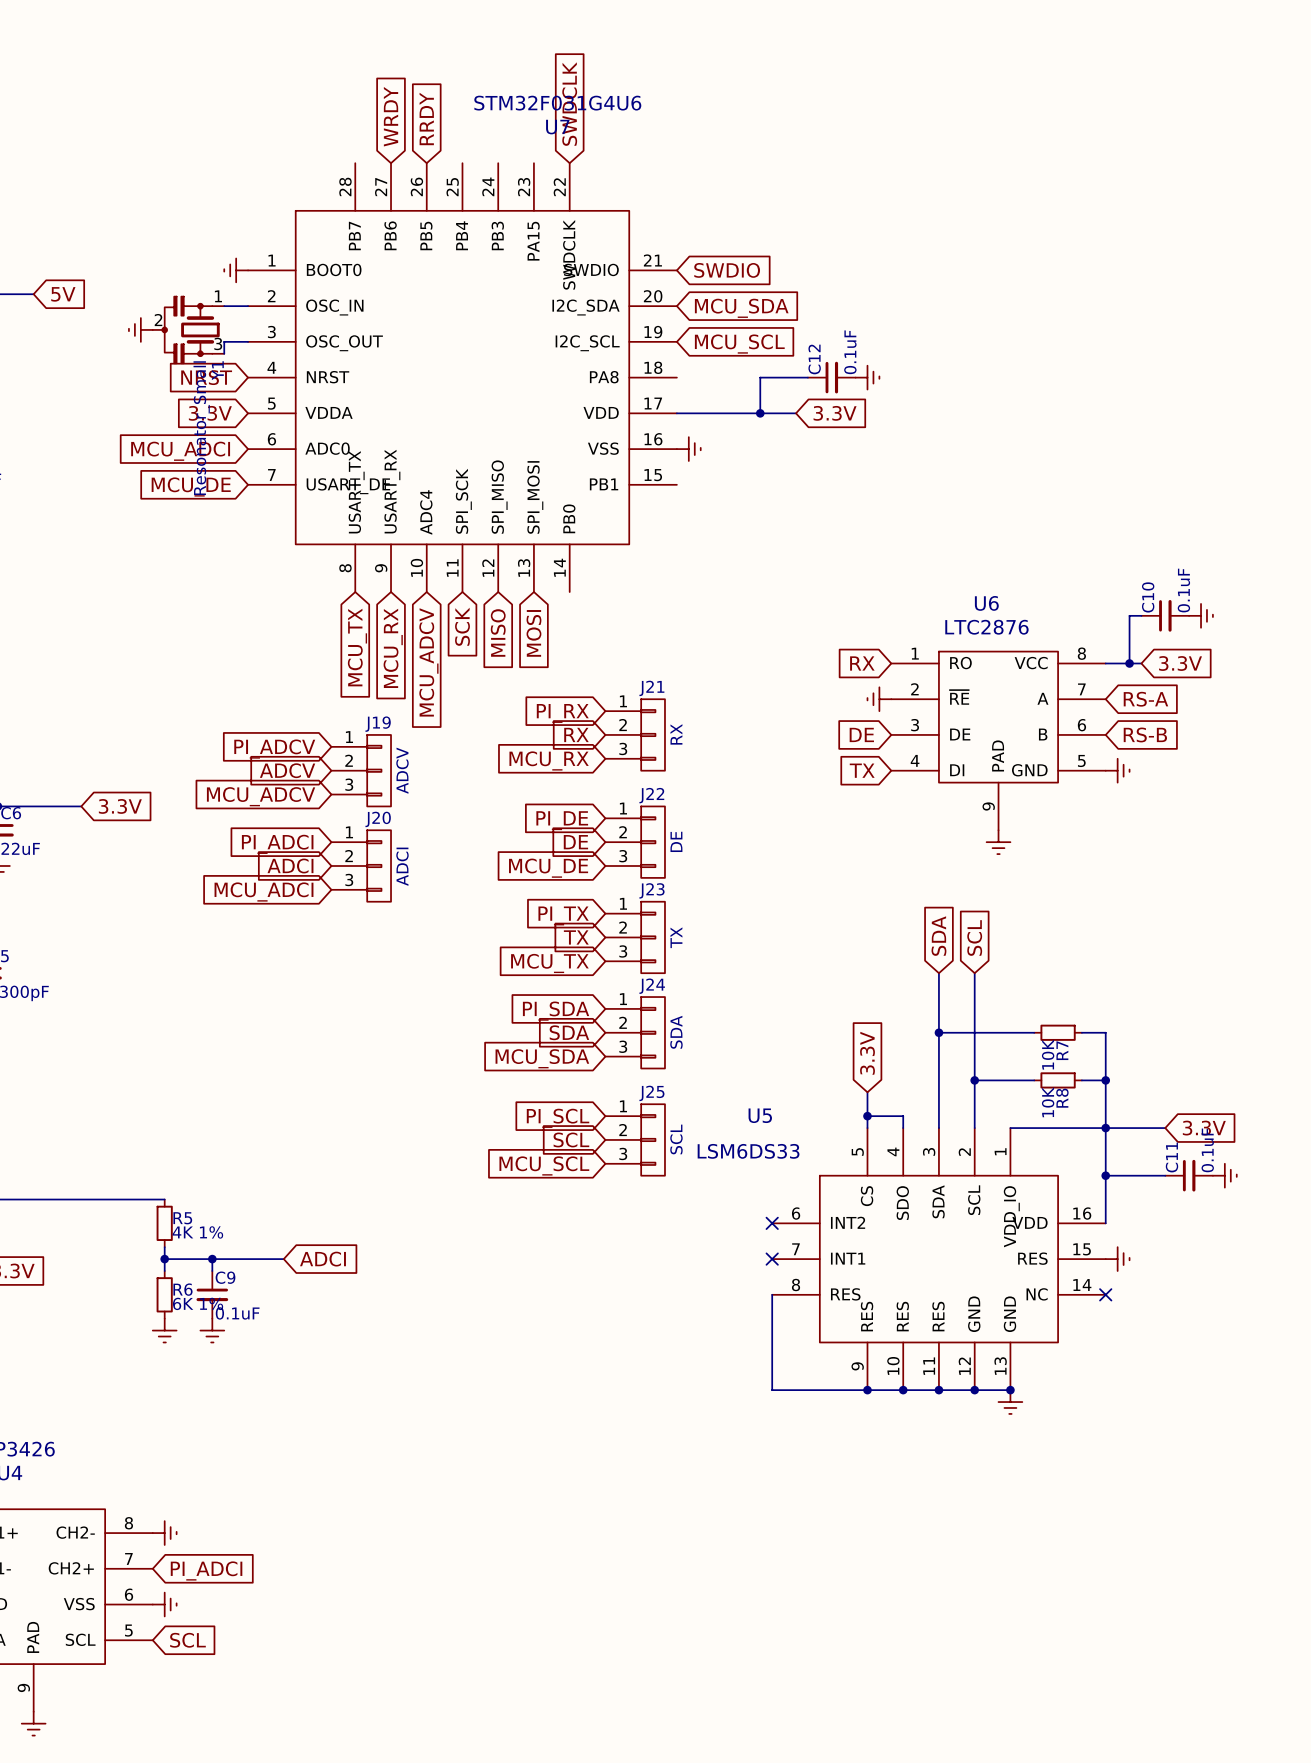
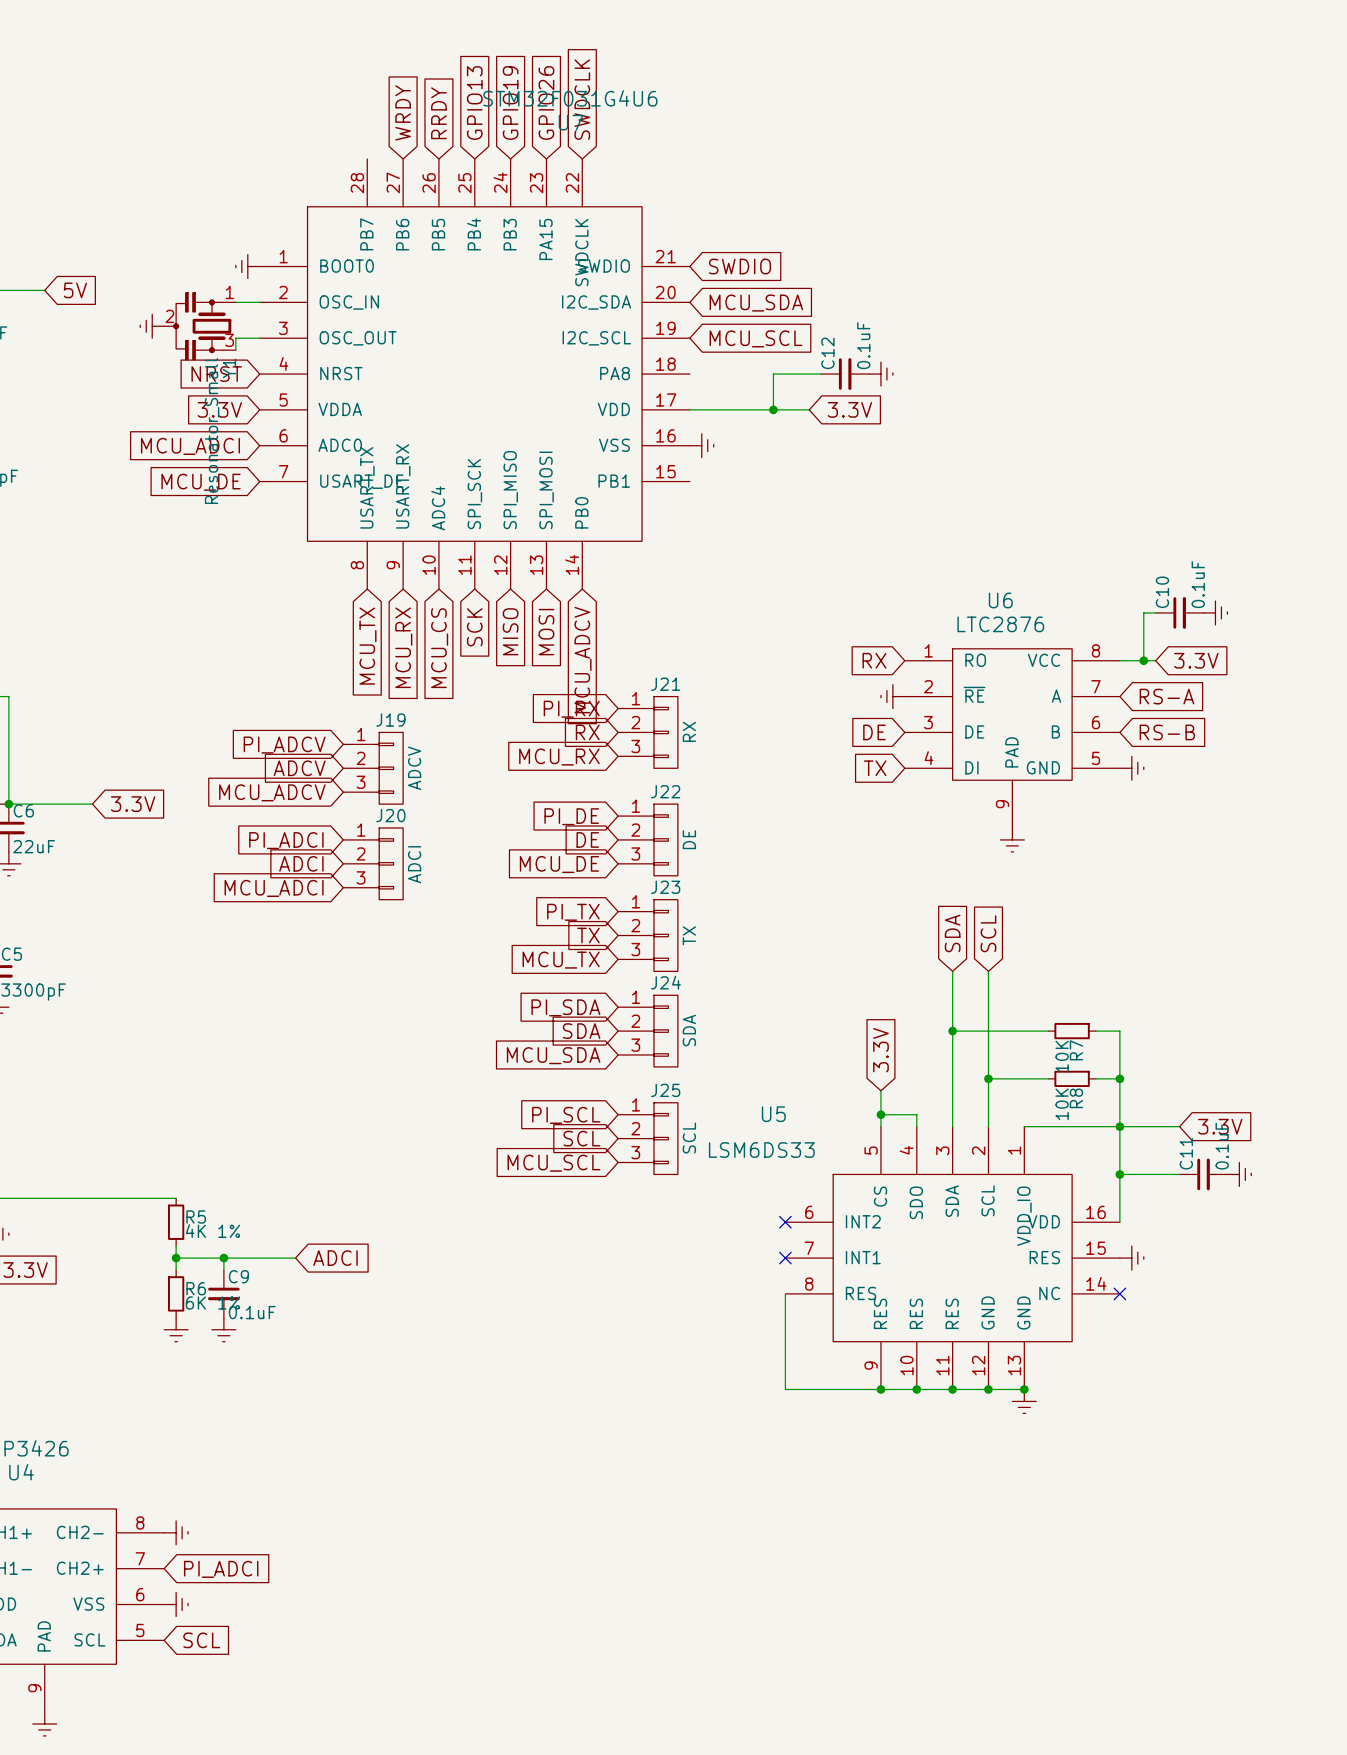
global label: none -> GPIO13 (474, 103)
global label: none -> GPIO19 (510, 103)
global label: none -> GPIO26 (546, 103)
global label: MCU_ADCV (428, 662) -> MCU_CS (439, 648)
global label: none -> MCU_ADCV (582, 660)

